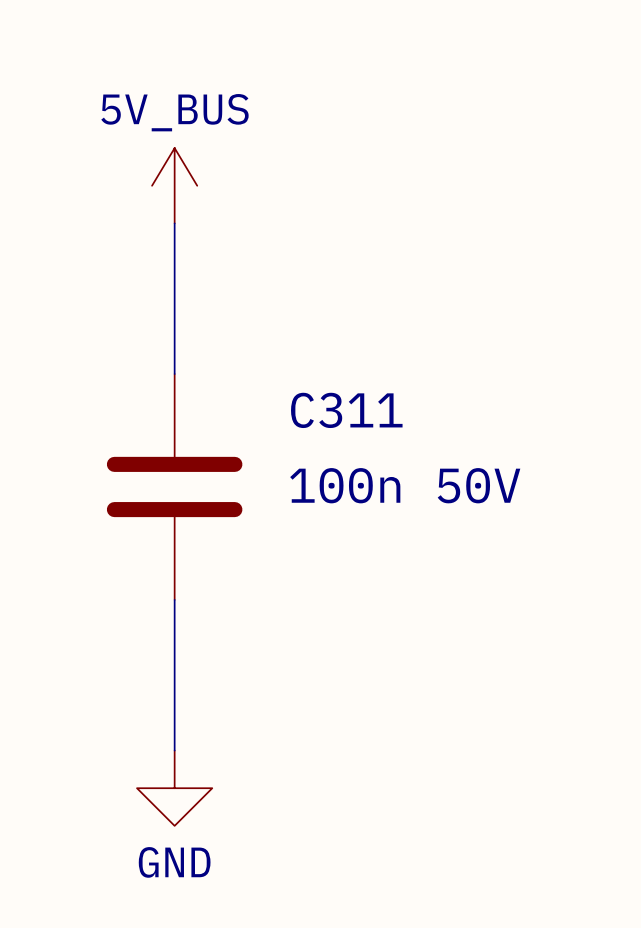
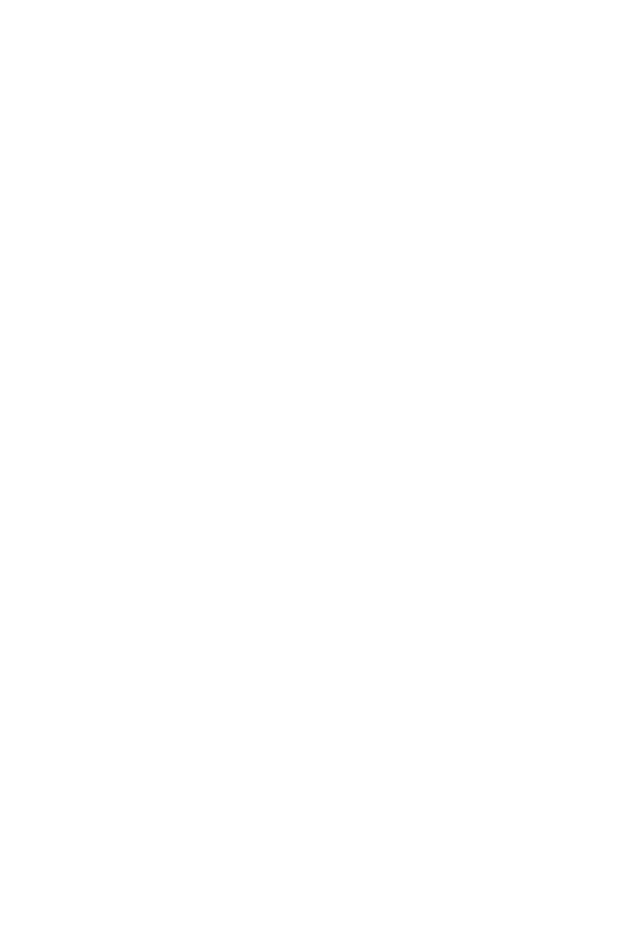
power symbol: 5V_BUS (174, 185) -> none
wire: (174, 223) (174, 374) -> none
C311: 100n 50V (174, 486) -> none
wire: (174, 599) (174, 750) -> none
power symbol: GND (174, 788) -> none

